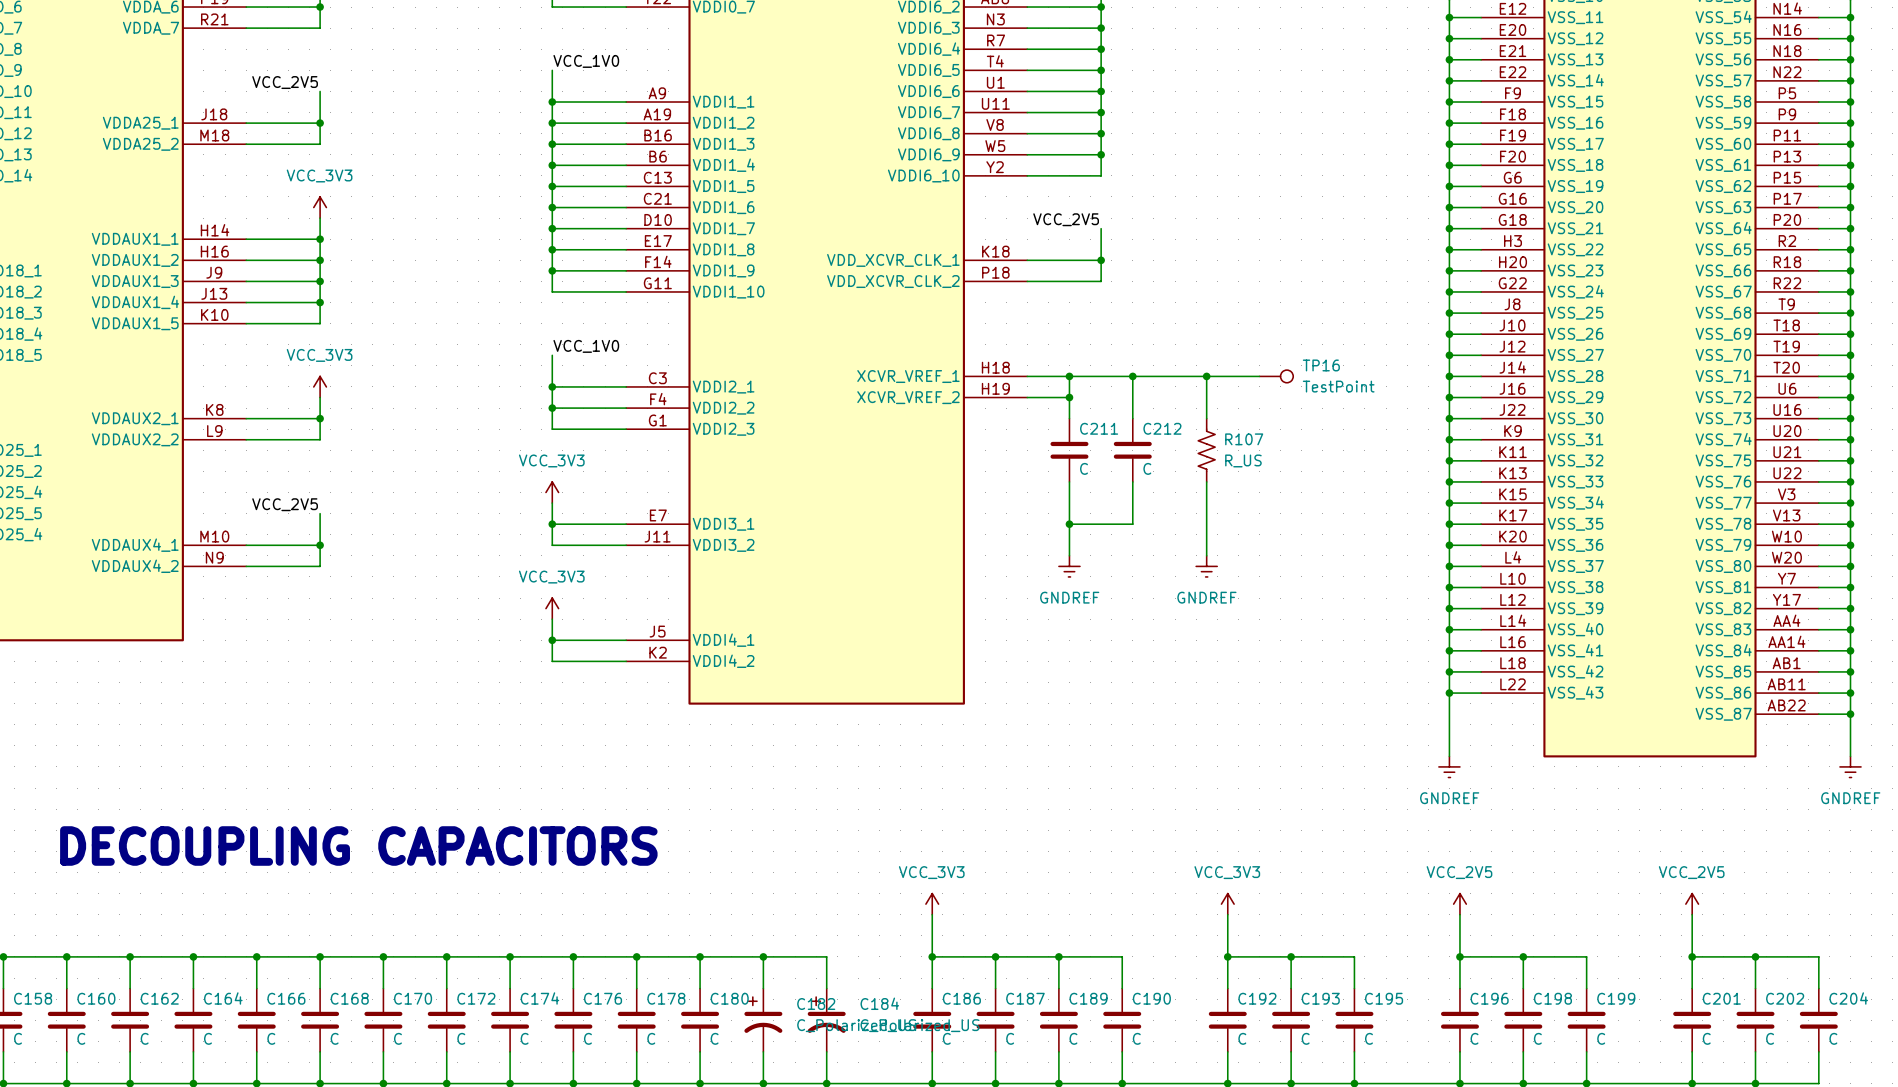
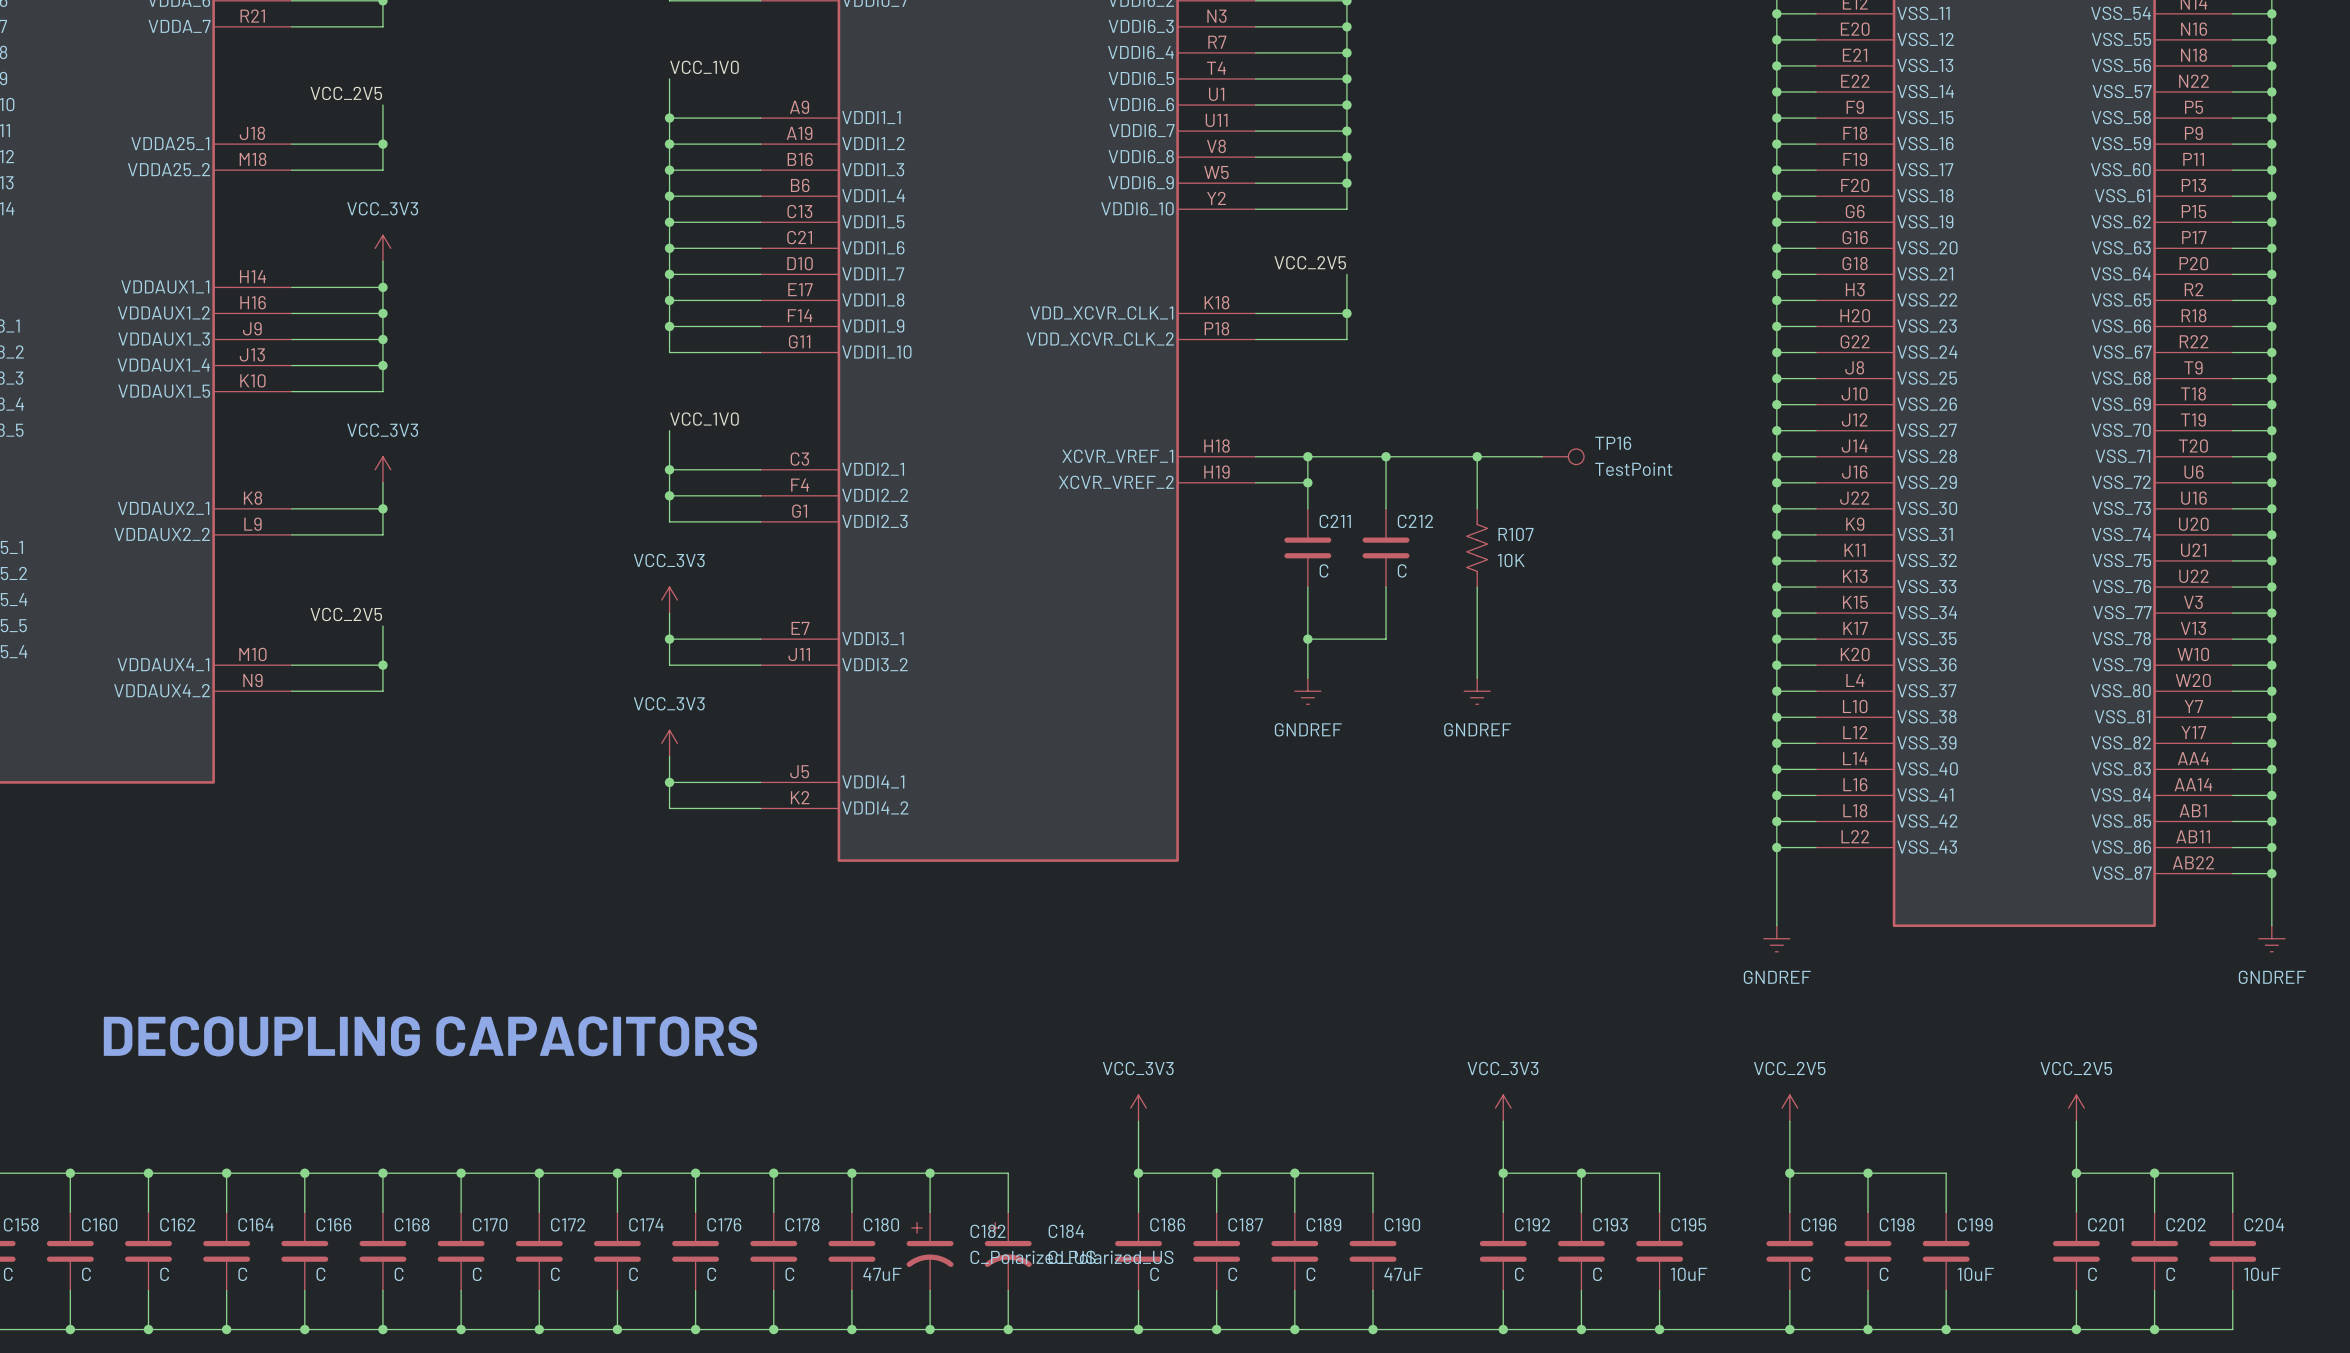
R107 value: R_US (1243, 460) -> 10K (1511, 560)
C180 value: C (714, 1038) -> 47uF (882, 1274)
C190 value: C (1136, 1038) -> 47uF (1403, 1274)
C195 value: C (1368, 1038) -> 10uF (1689, 1274)
C199 value: C (1601, 1038) -> 10uF (1975, 1274)
C204 value: C (1833, 1038) -> 10uF (2262, 1274)

